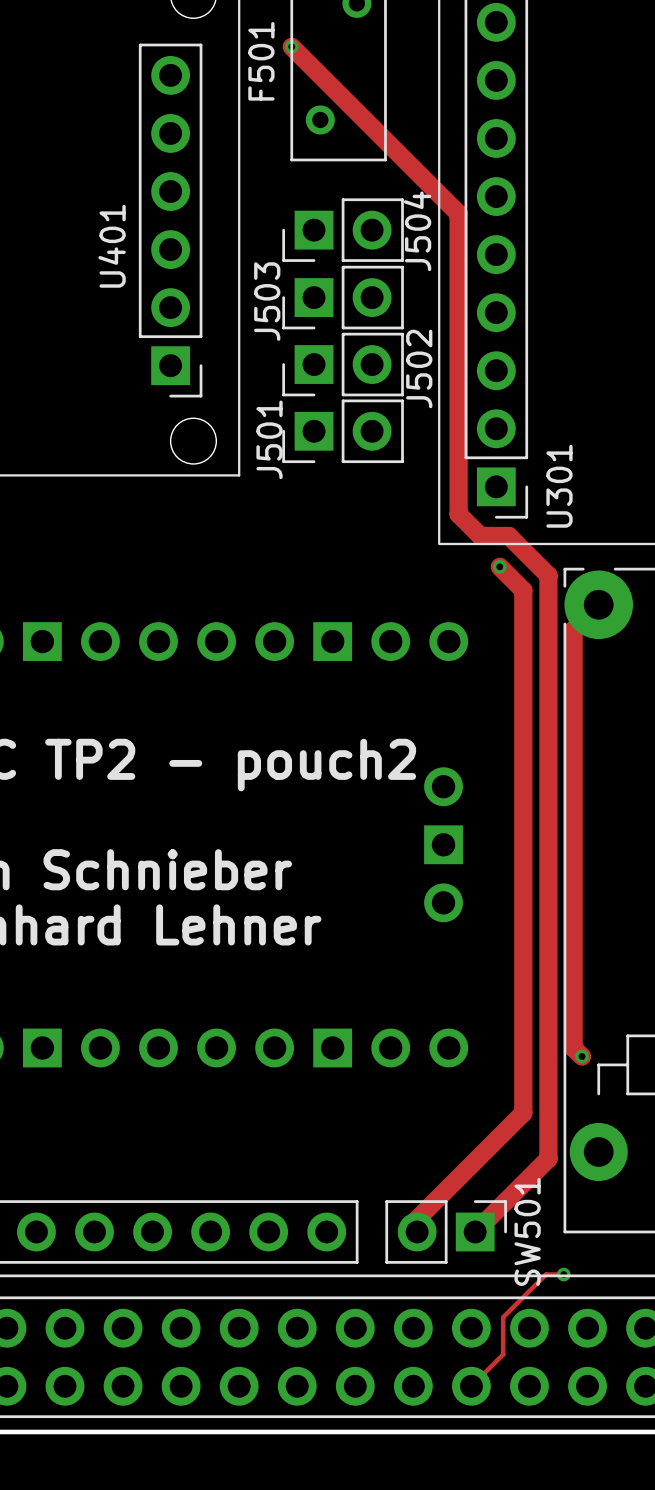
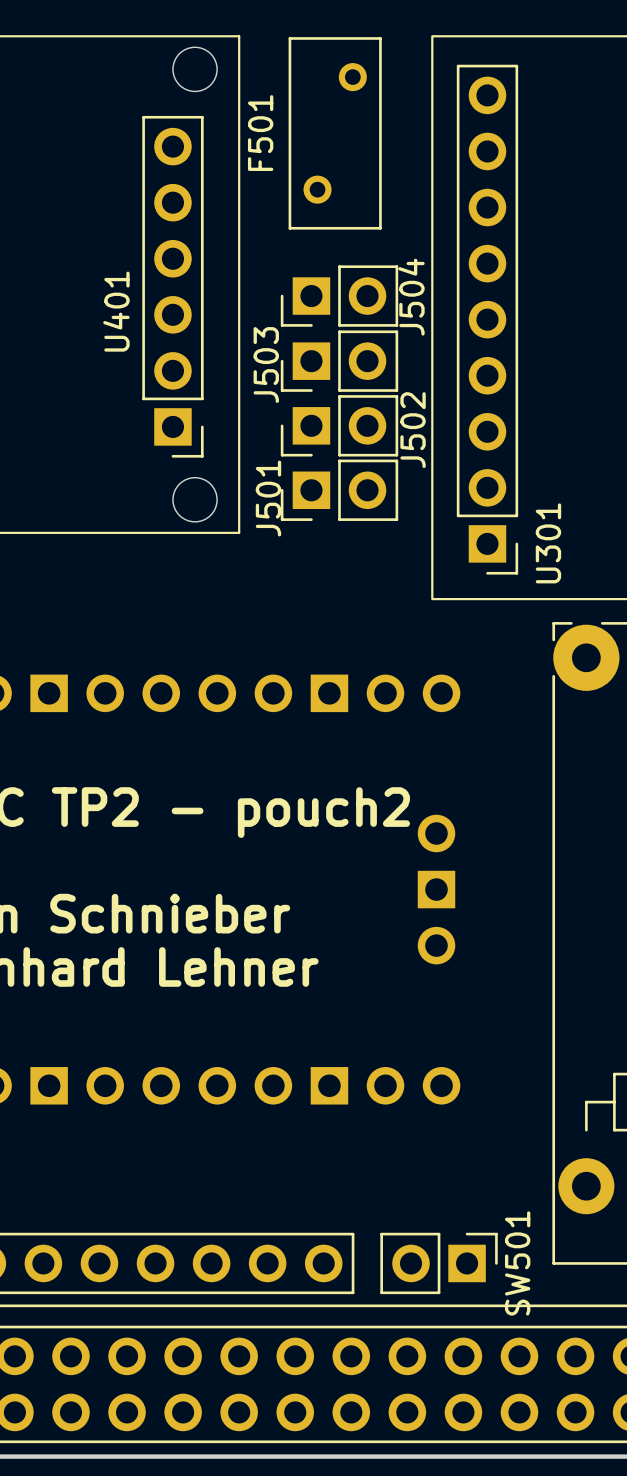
track: (291, 46) (458, 213) (458, 514) (480, 535) (508, 535) (548, 575) (548, 1158) (475, 1231) -> none
via: (291, 46) -> none
track: (499, 566) (523, 590) (523, 1113) (417, 1219) (417, 1231) -> none
via: (499, 566) -> none
track: (598, 604) (573, 629) (573, 1048) (582, 1056) -> none
via: (582, 1056) -> none
track: (563, 1274) (545, 1274) (503, 1317) (503, 1354) (471, 1386) -> none
via: (563, 1274) -> none

